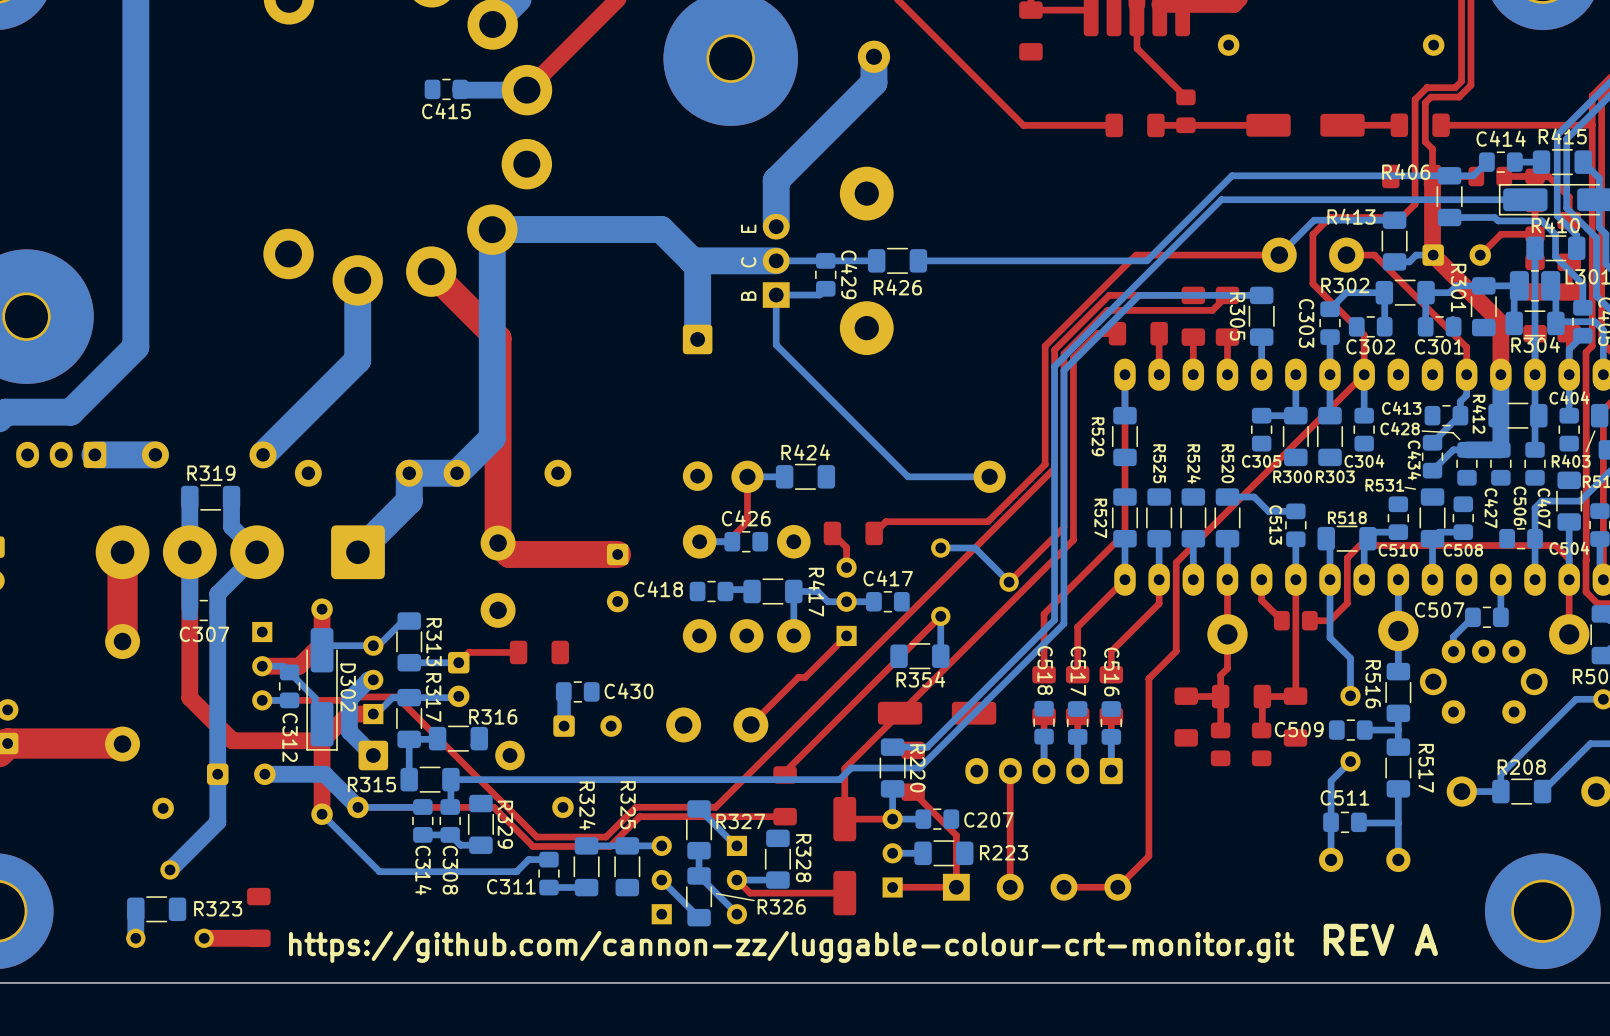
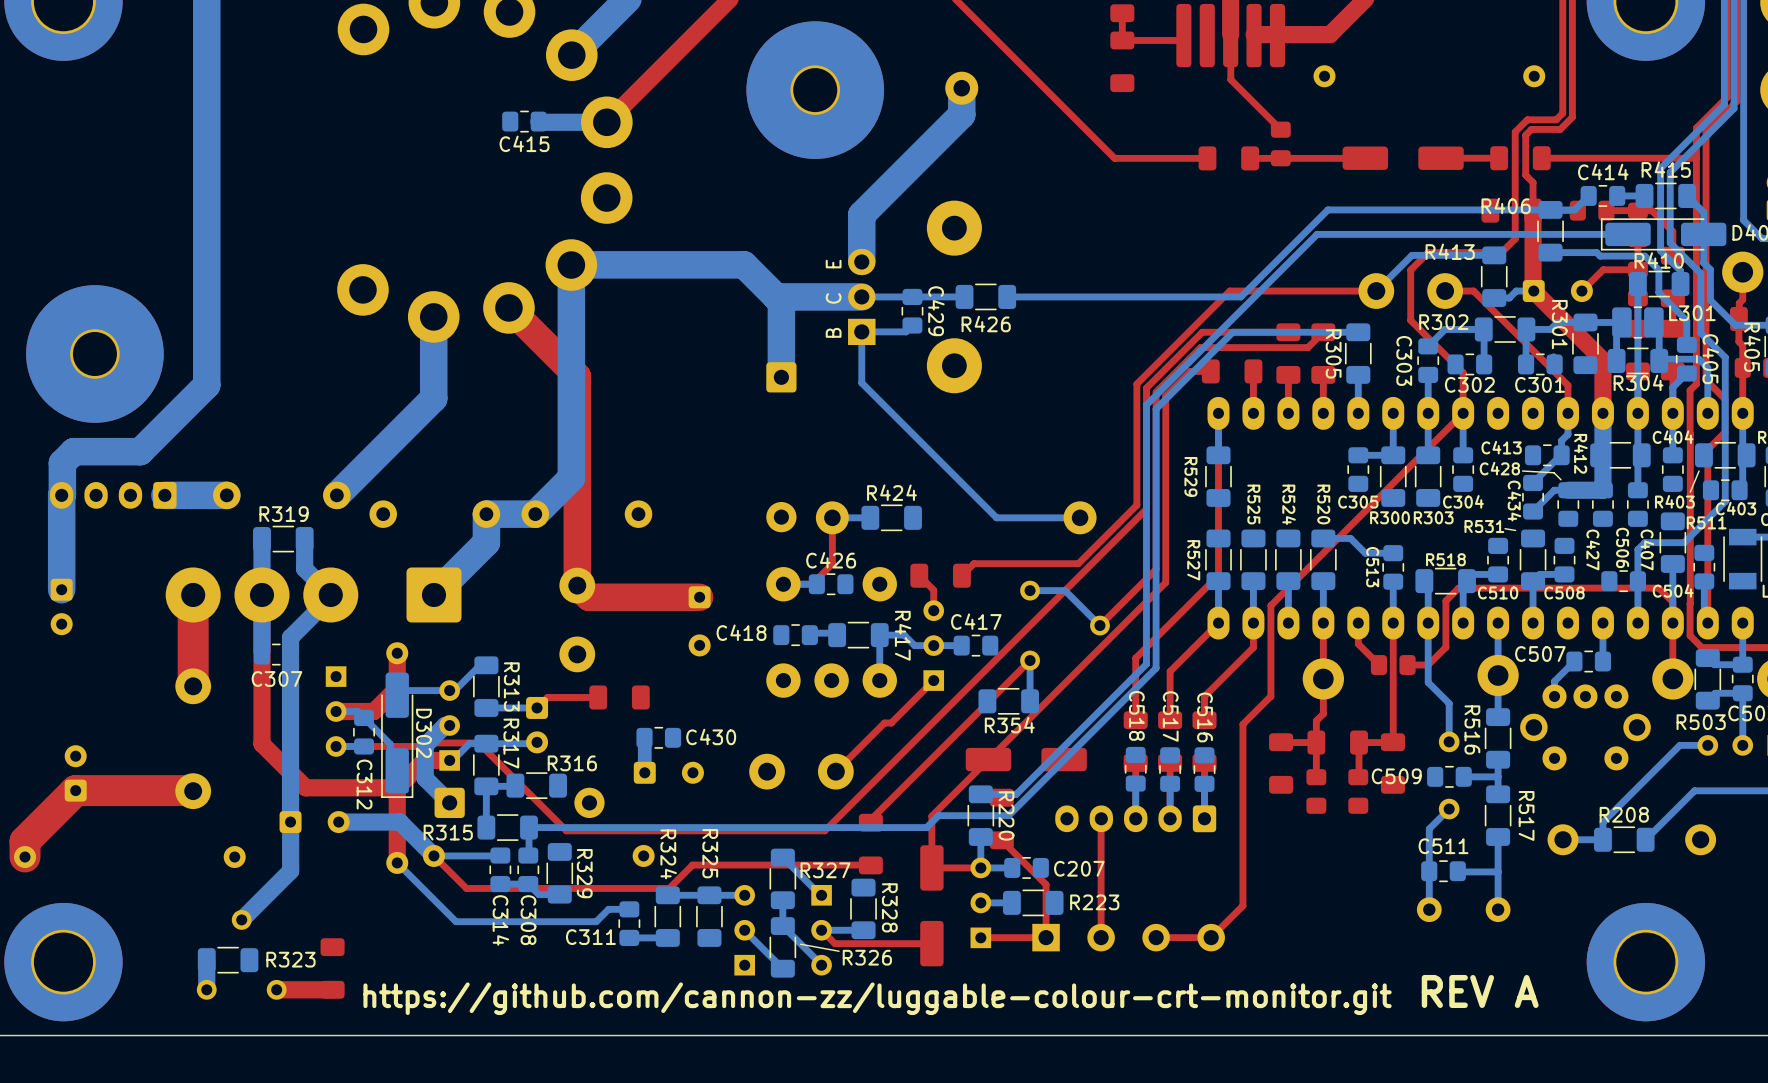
top track: (396, 696) (536, 837) (606, 837) (635, 807) (715, 807) (740, 782) -> (473, 742) (478, 742) (566, 830) (824, 830)
top track: (357, 807) (494, 807) (533, 846) (609, 846) (639, 816) (785, 816) -> (433, 855) (466, 888) (669, 888) (692, 865) (870, 865)

